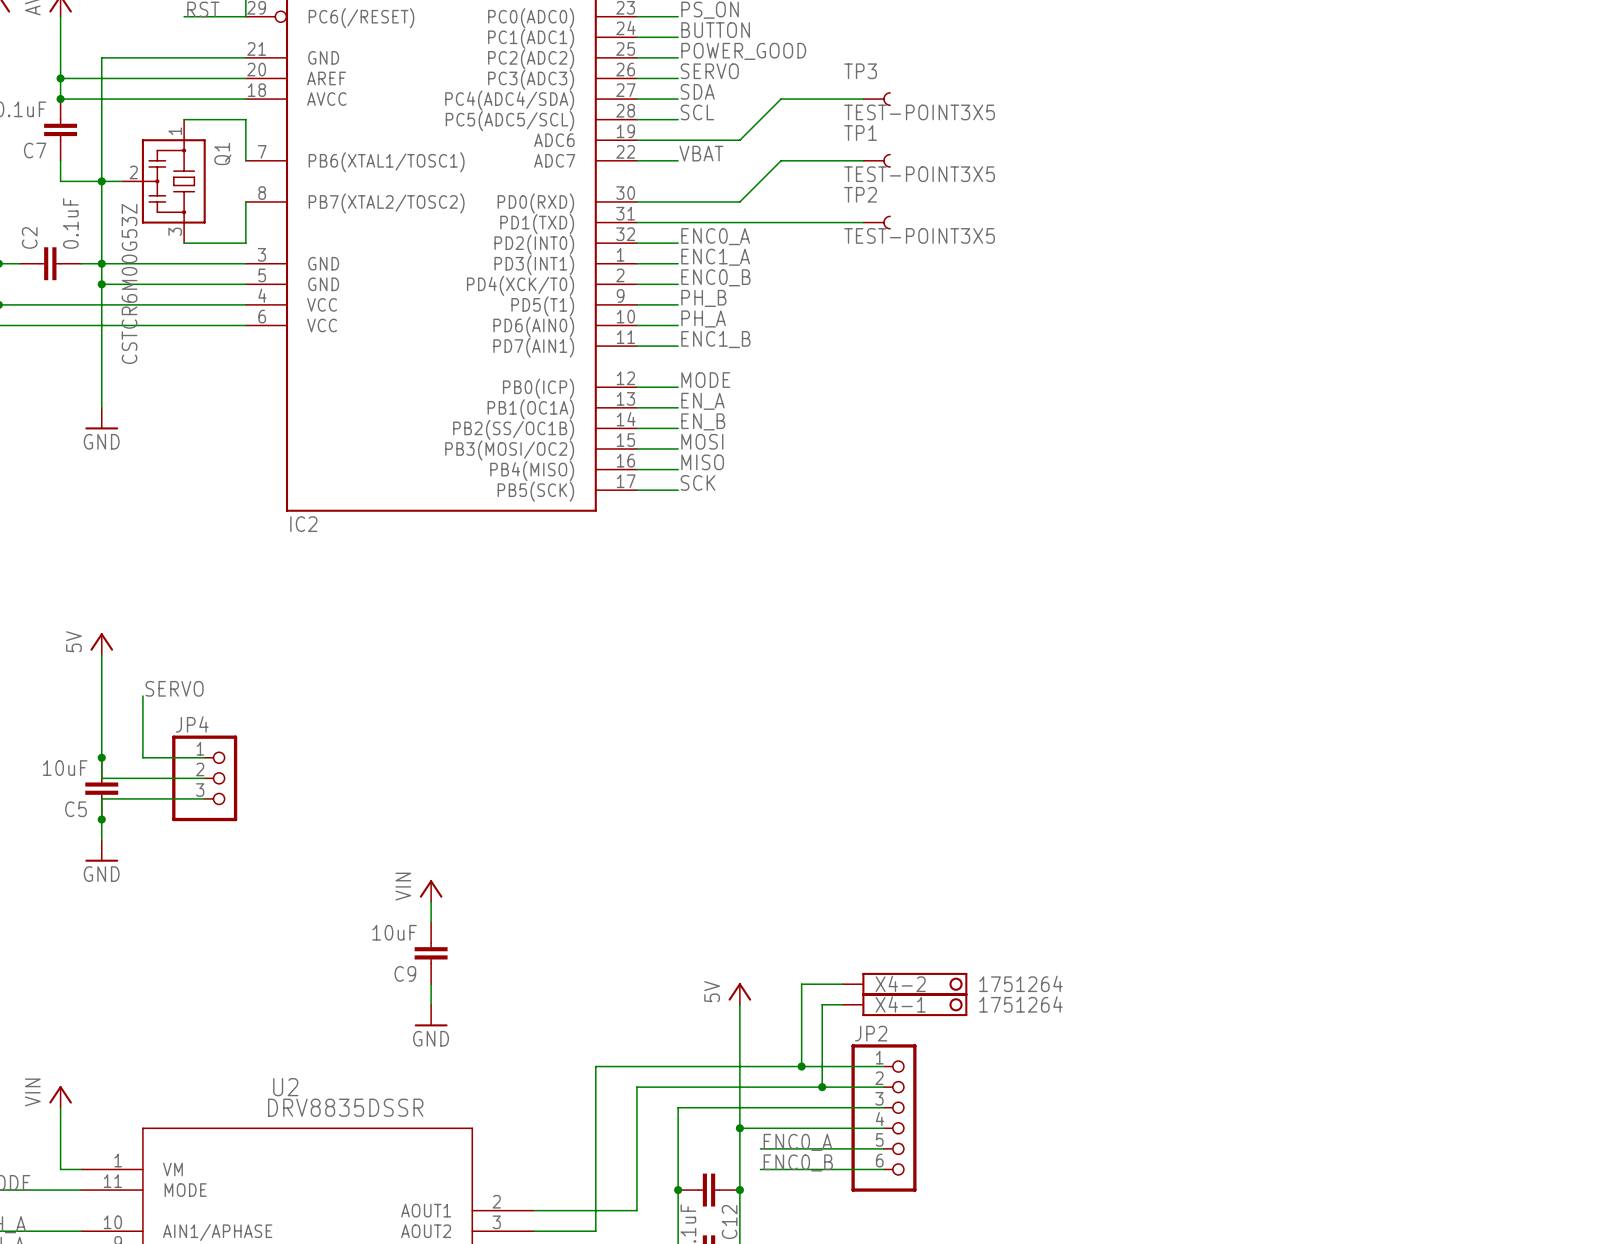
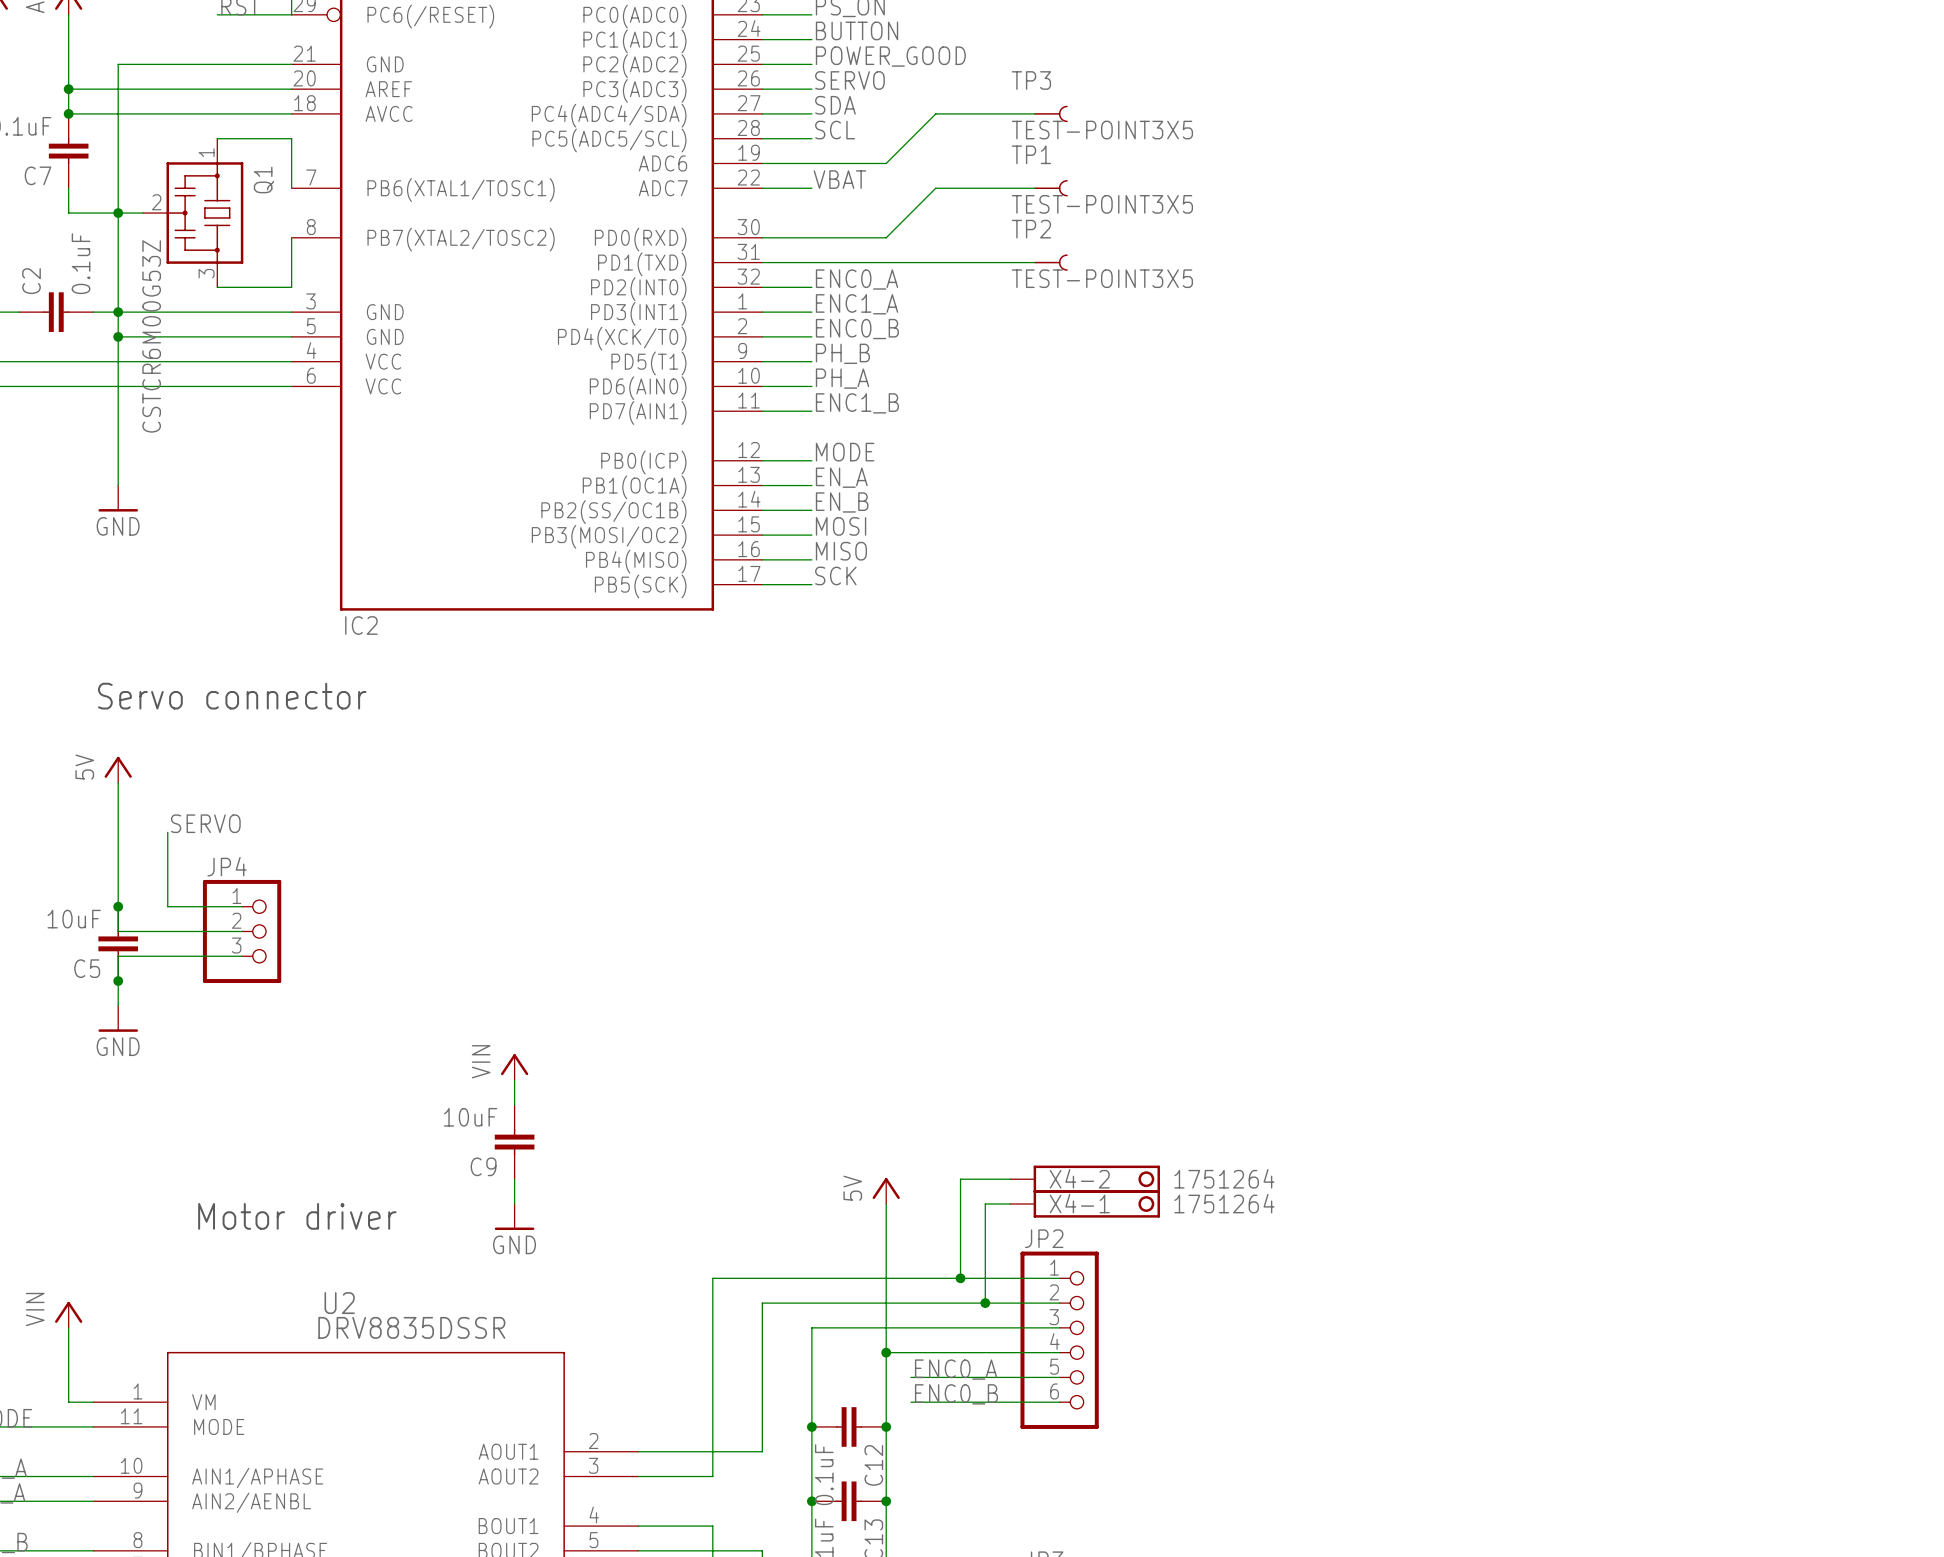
text: none -> Servo connector (232, 696)
text: none -> Motor driver (297, 1216)

